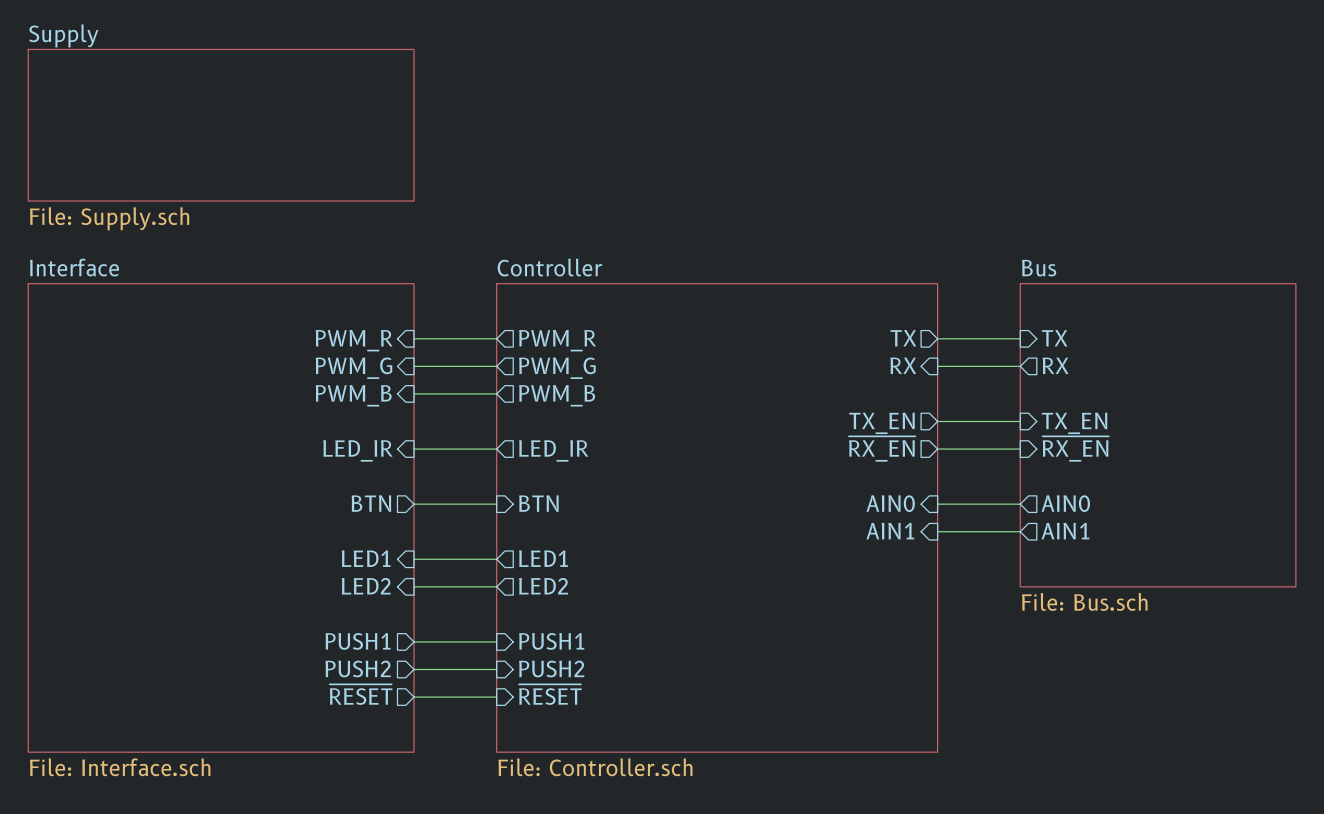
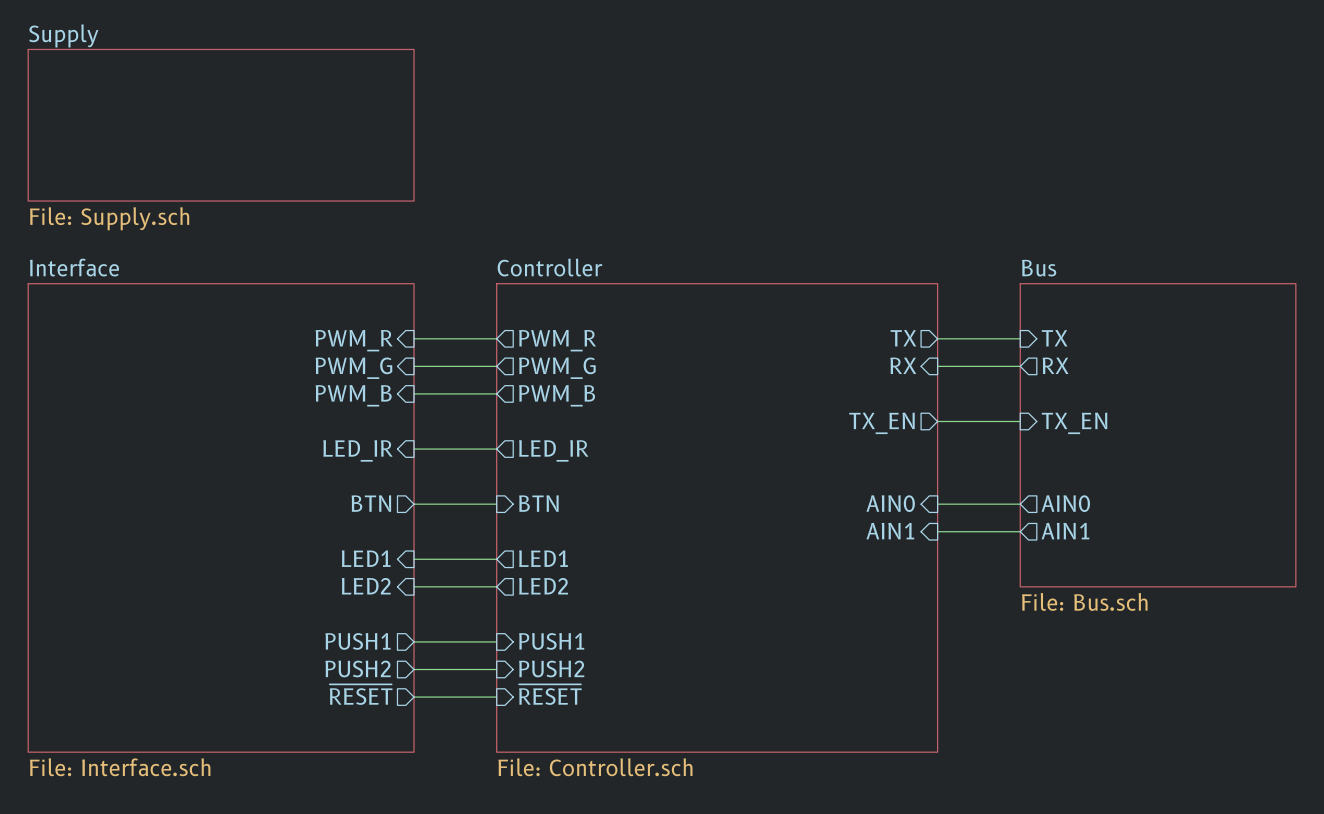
sheet pin: ~{RX_EN} (882, 449) -> none
wire: (937, 449) (1020, 449) -> none
sheet pin: ~{RX_EN} (1075, 449) -> none

